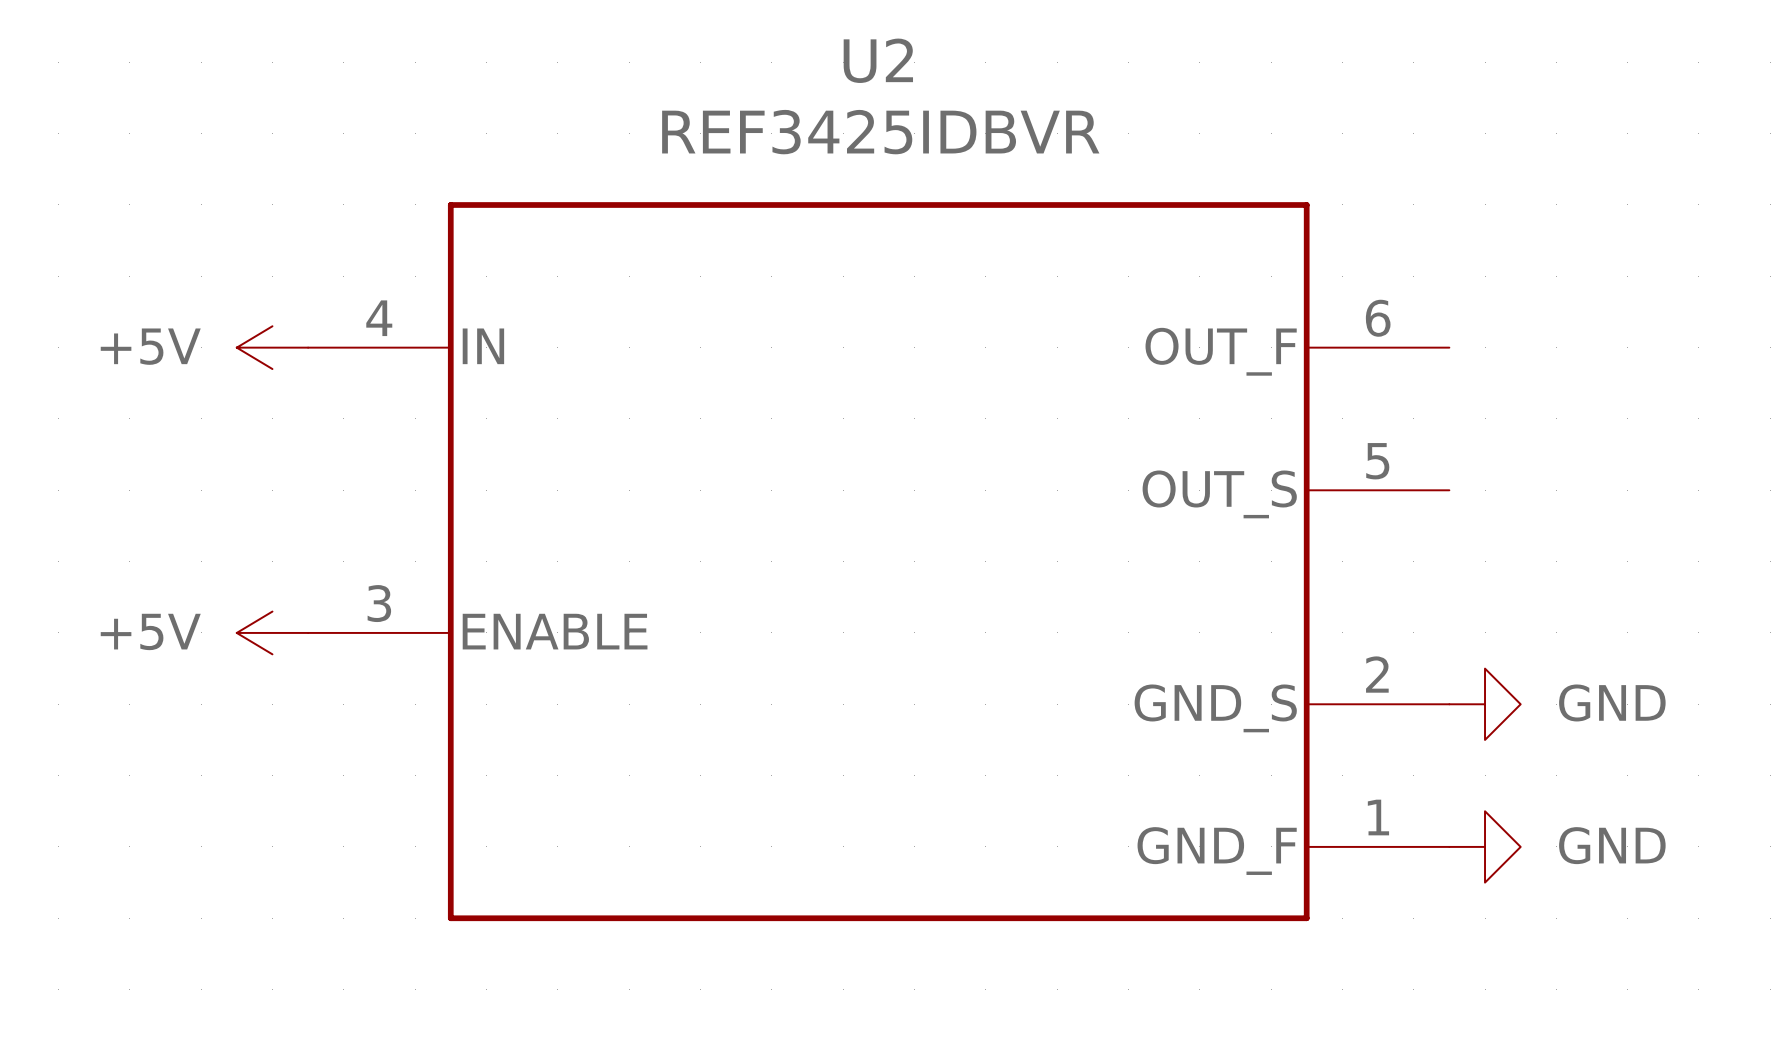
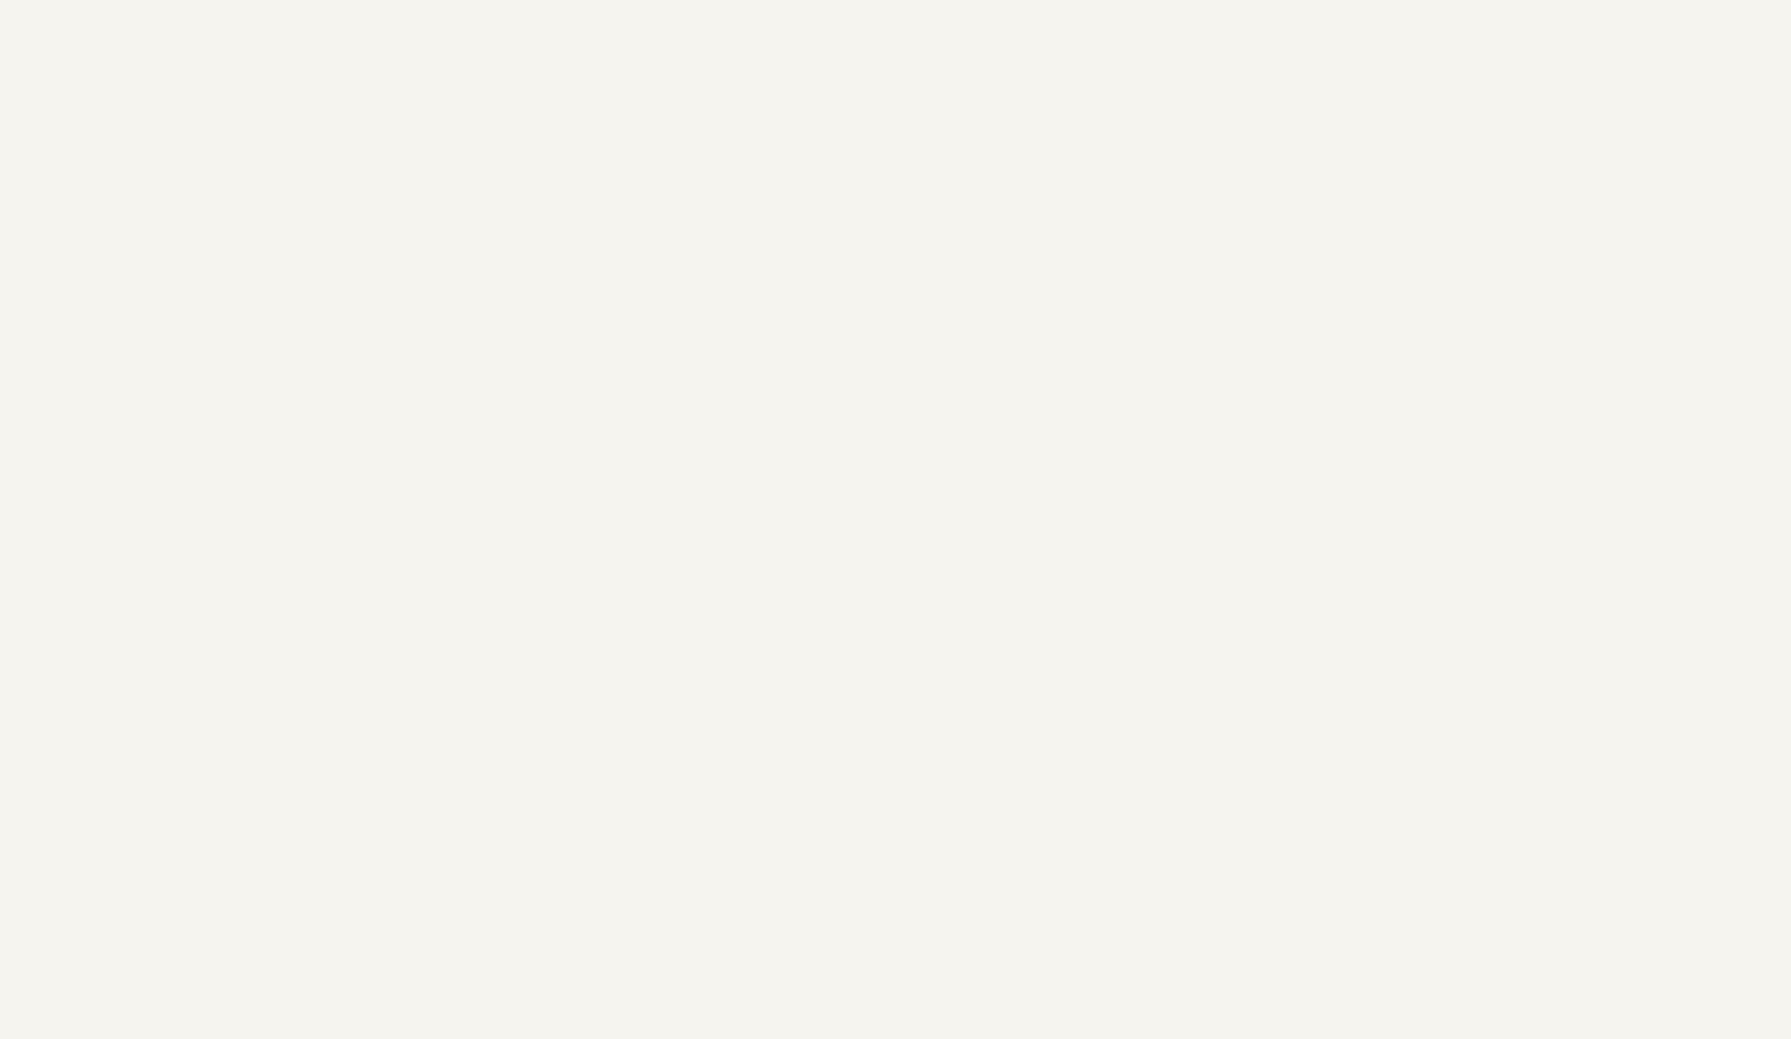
power symbol: +5V (272, 347) -> none
U2: REF3425IDBVR (878, 561) -> none
power symbol: +5V (272, 632) -> none
power symbol: GND (1485, 704) -> none
power symbol: GND (1485, 846) -> none

